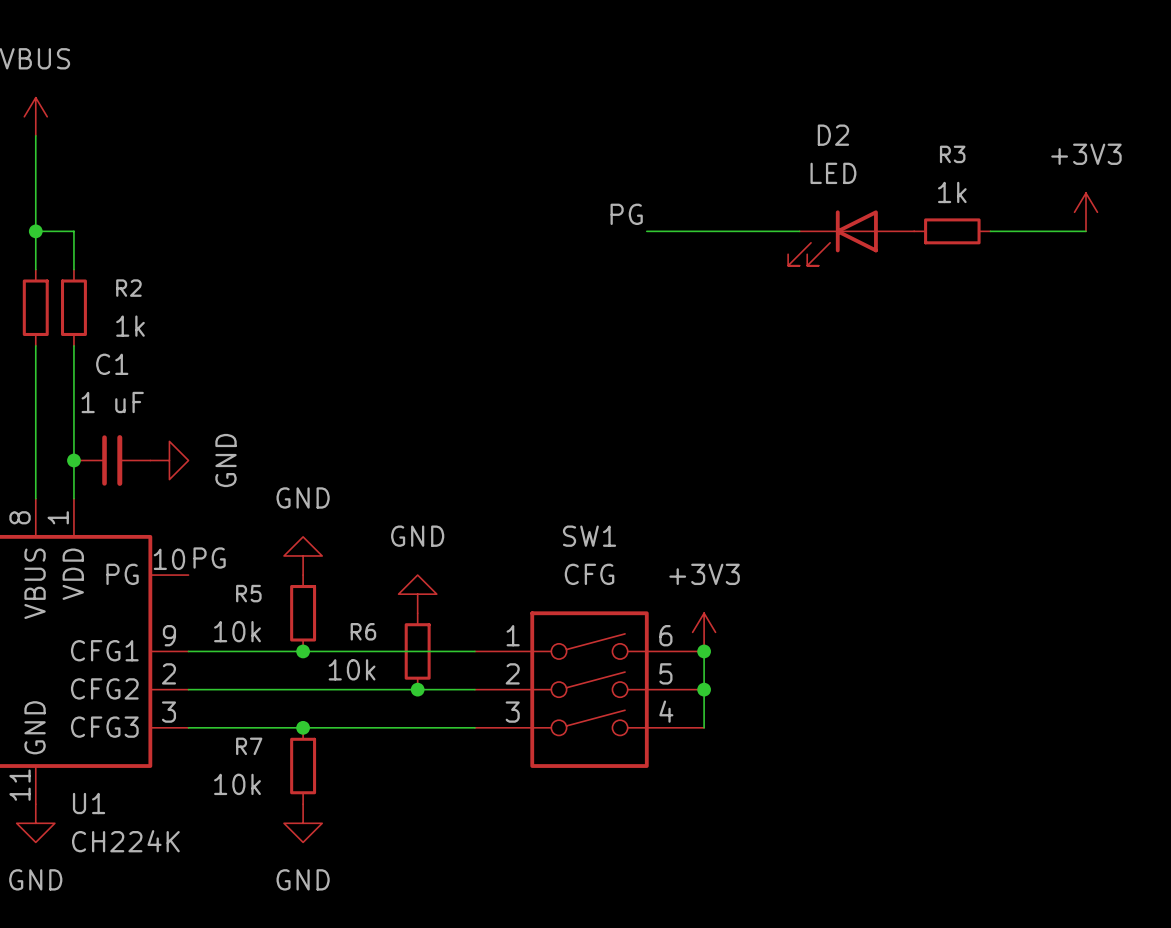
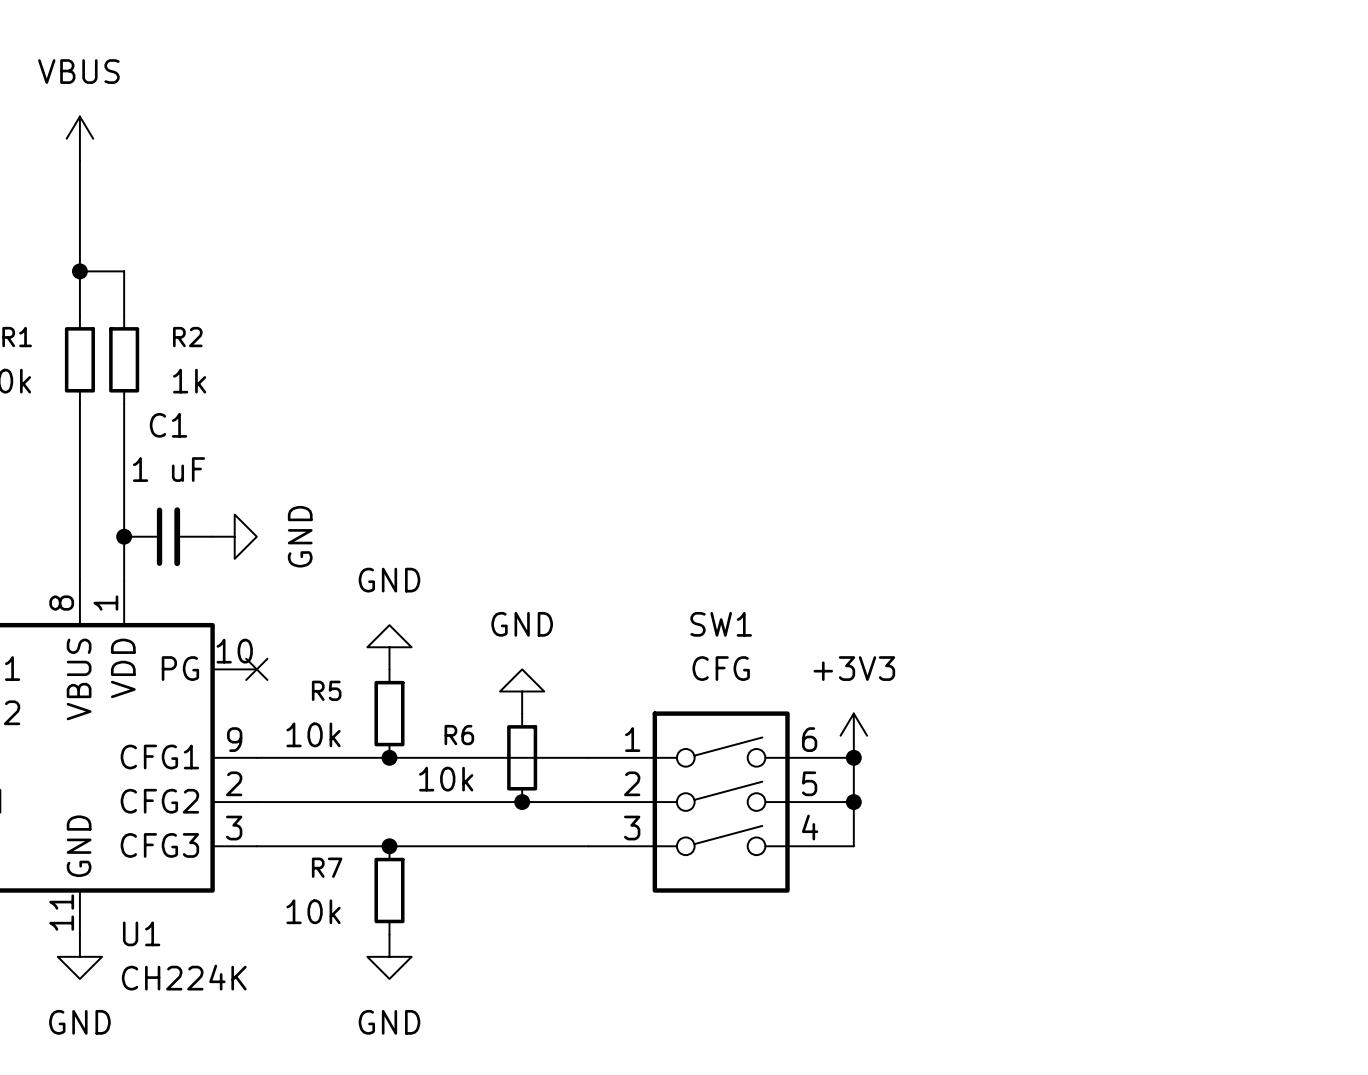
power symbol: +3V3 (1085, 212) -> none
label: PG (626, 214) -> none
wire: (646, 231) (799, 231) -> none
R3: 1k (952, 231) -> none
wire: (990, 231) (1085, 231) -> none
D2: LED (851, 238) -> none
label: PG (209, 558) -> none
no-connect mark: none -> (256, 669)

